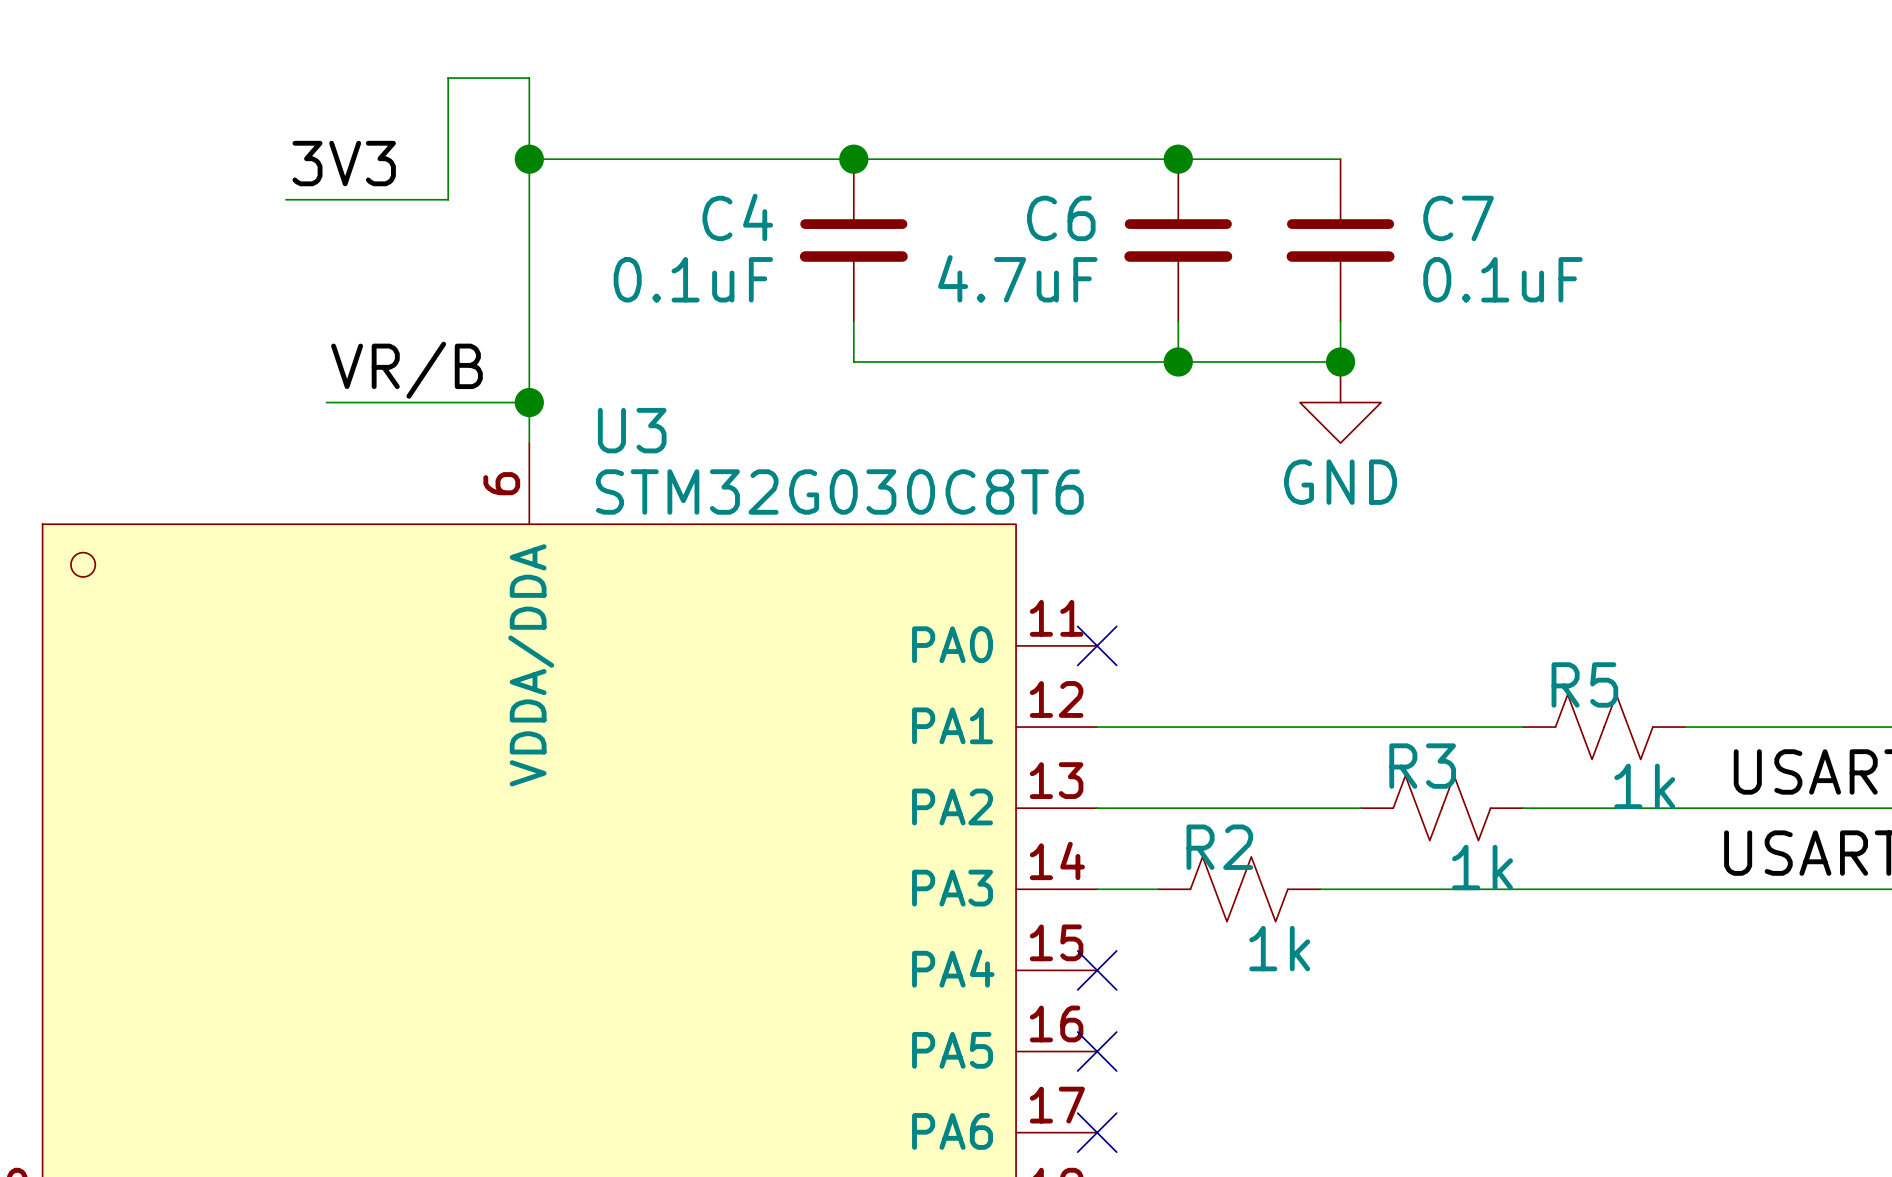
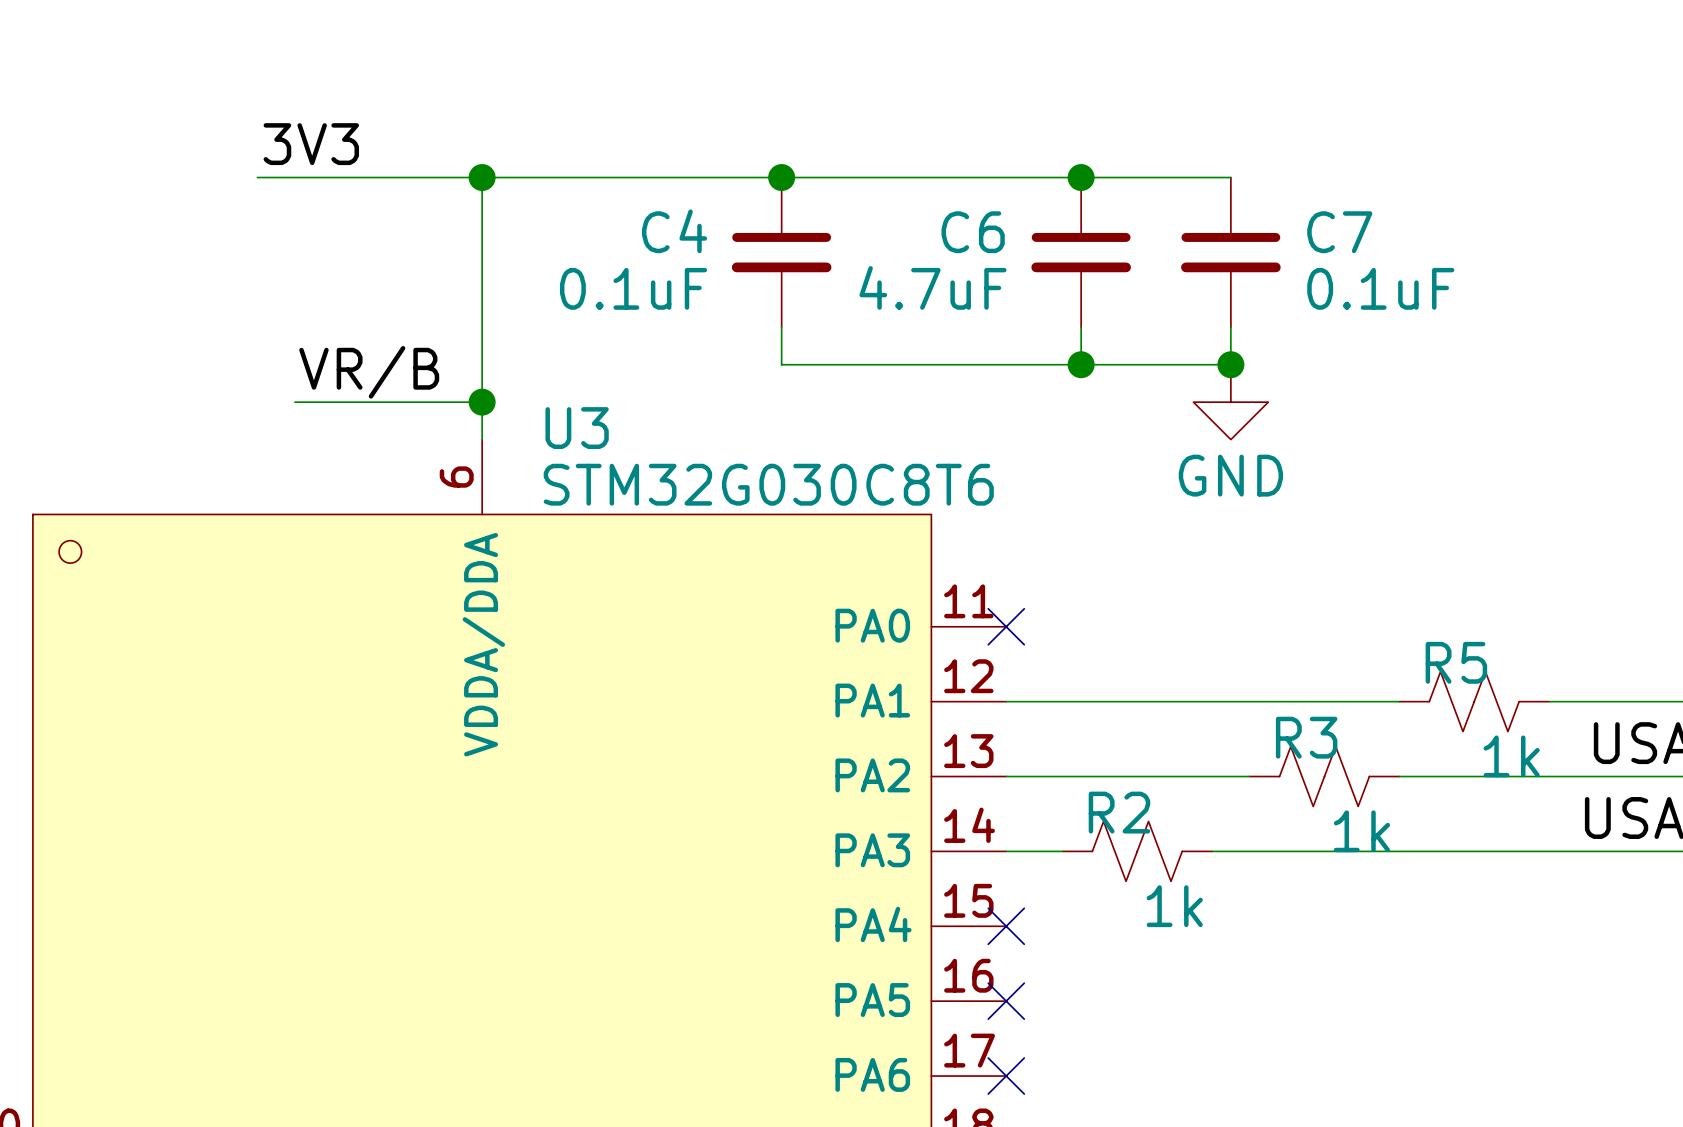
wire: (529, 159) (529, 78) (448, 78) (448, 199) (285, 199) -> (482, 177) (257, 177)
label position: 3V3 (344, 163) -> 3V3 (311, 144)

